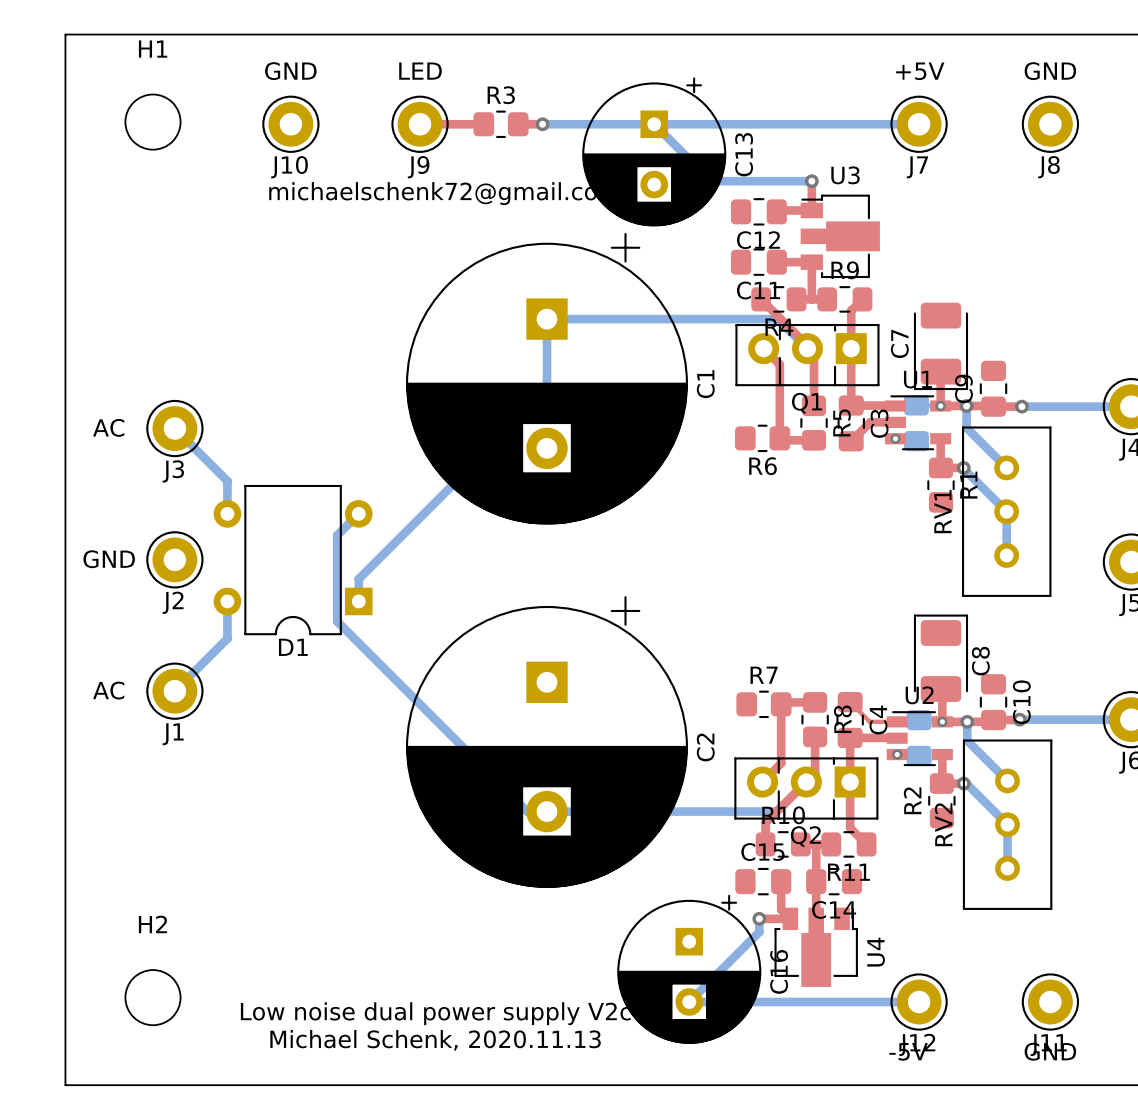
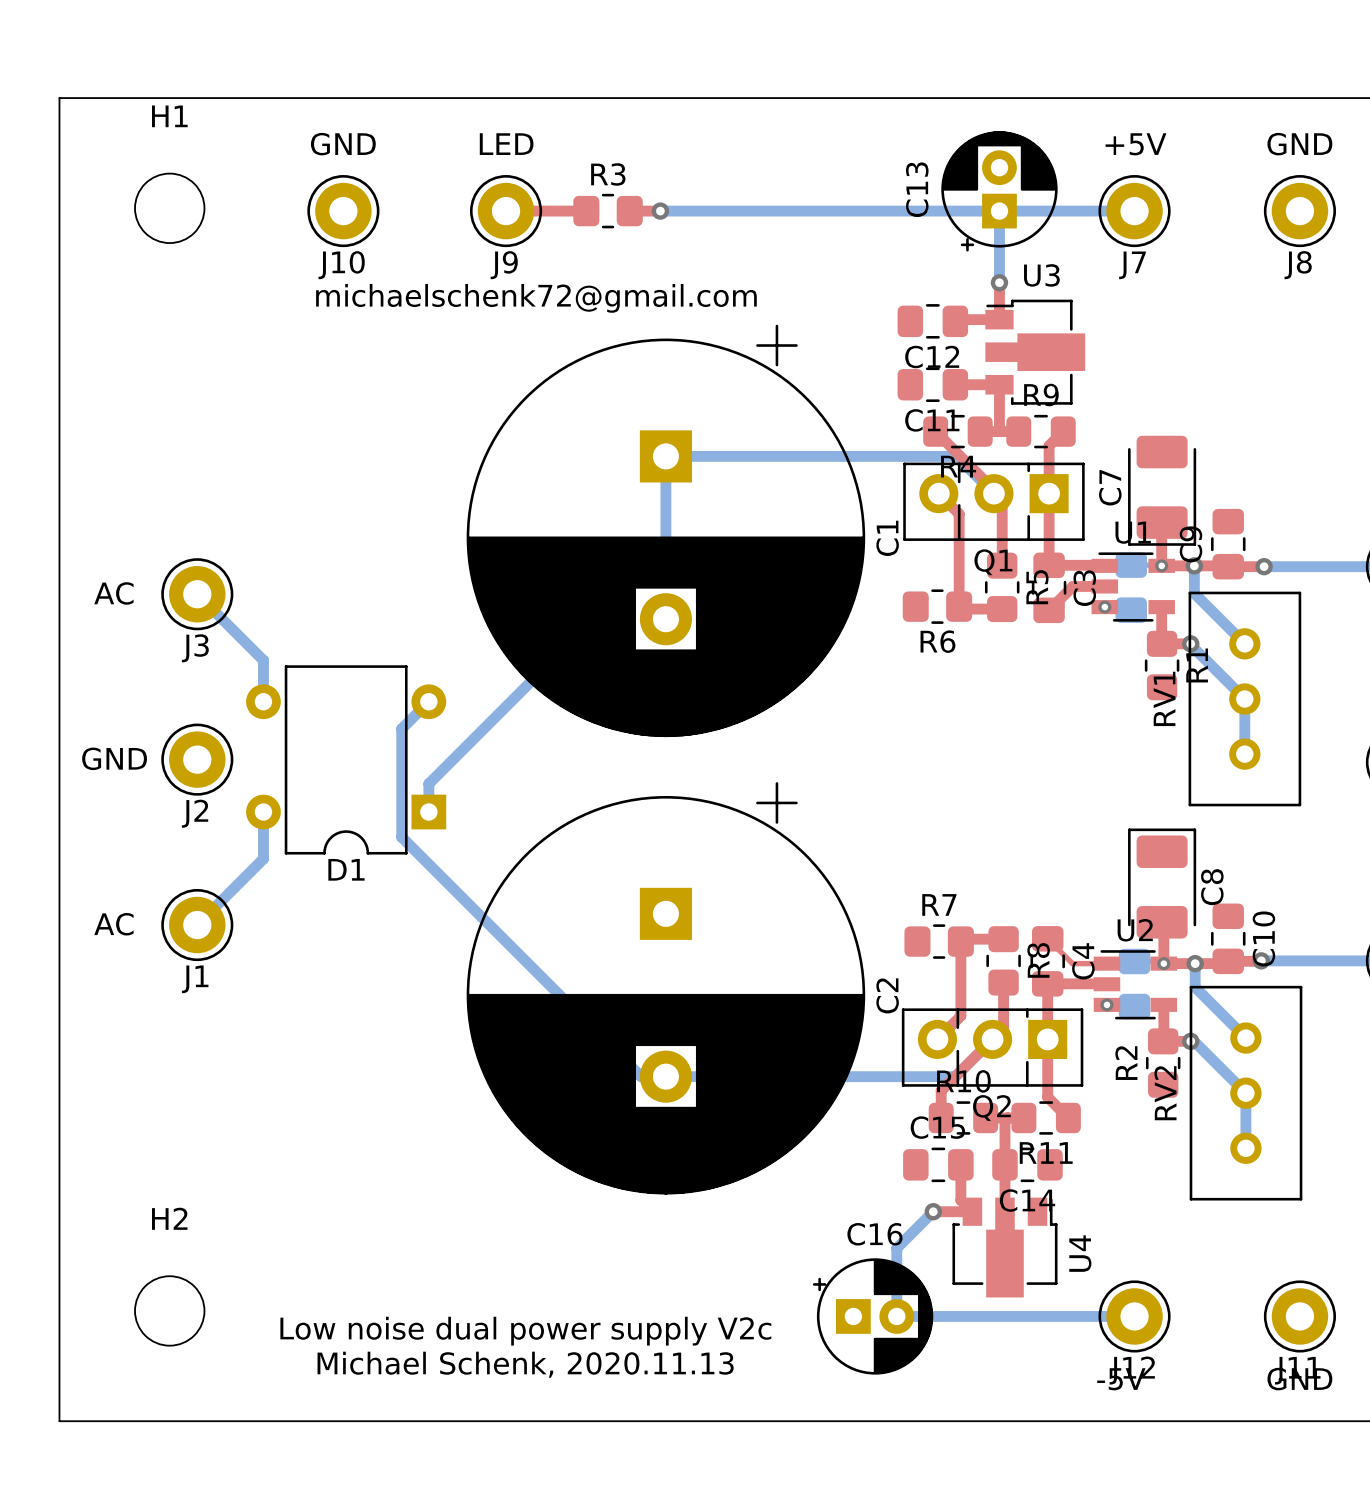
C13 footprint: [582, 77, 727, 227] -> [941, 131, 1058, 252]
bottom track: (654, 124) (711, 181) (811, 181) -> (999, 211) (999, 282)
C13 name position: C13 (744, 154) -> C13 (917, 189)
C1 footprint: [406, 232, 688, 525] -> [466, 324, 866, 738]
C2 footprint: [406, 596, 688, 888] -> [466, 782, 866, 1195]
C16 footprint: [617, 894, 762, 1044] -> [812, 1258, 934, 1375]
bottom track: (759, 918) (759, 931) (689, 1002) (730, 1002) -> (933, 1211) (896, 1248) (896, 1316)
C16 name position: C16 (779, 971) -> C16 (874, 1234)

